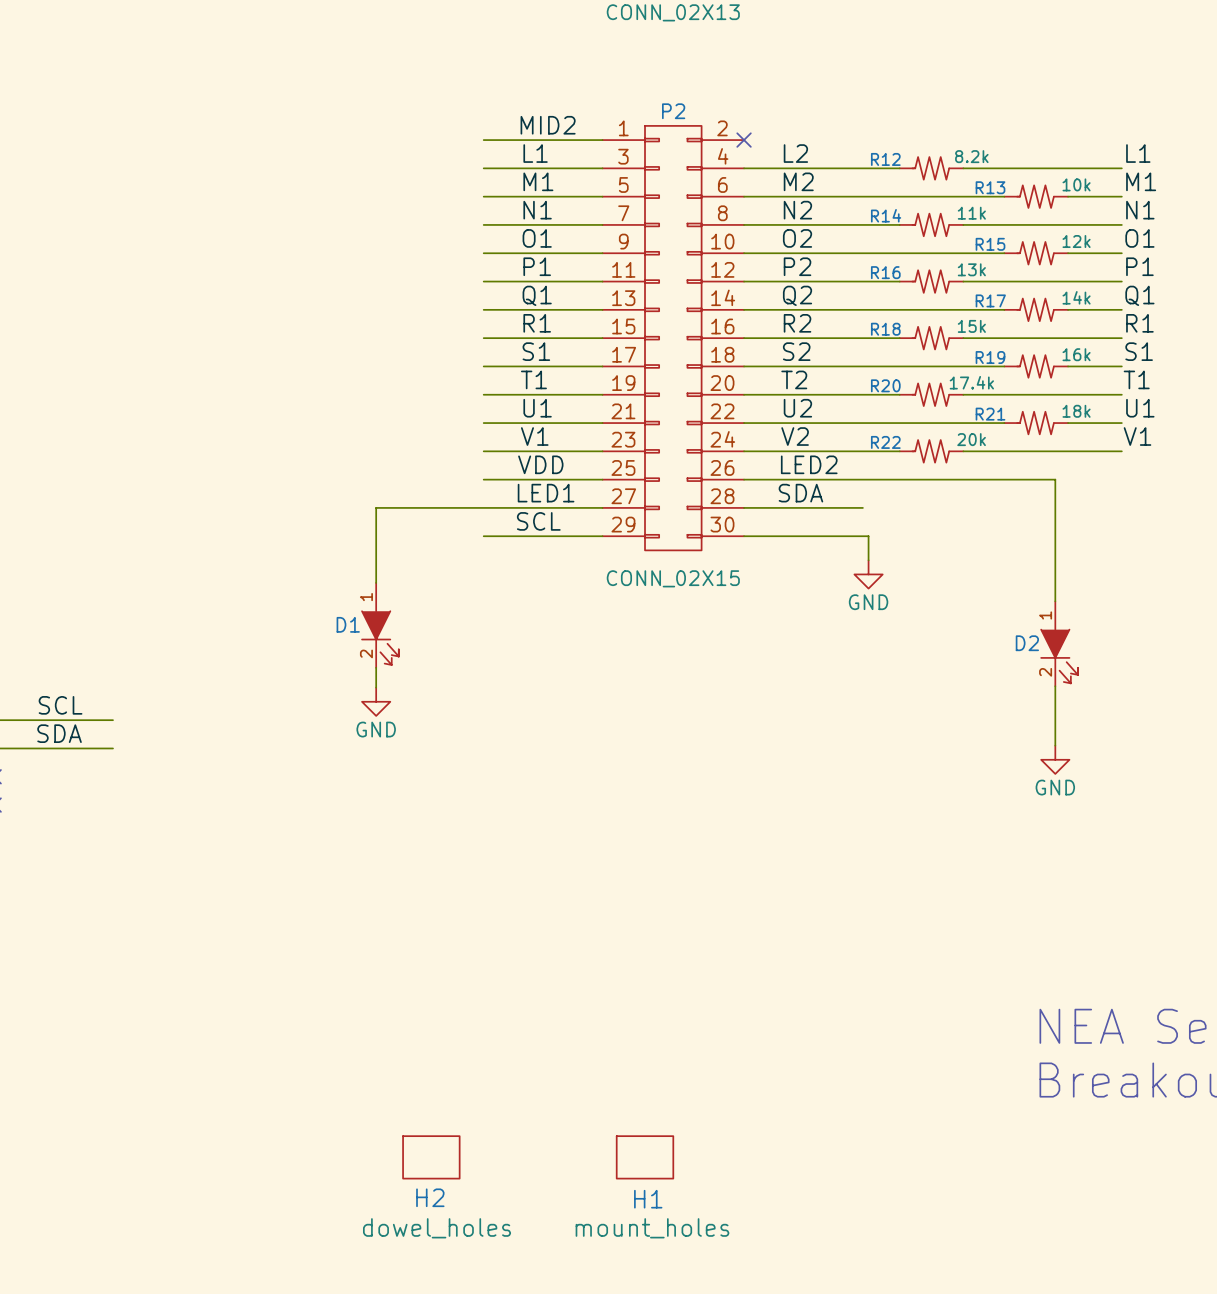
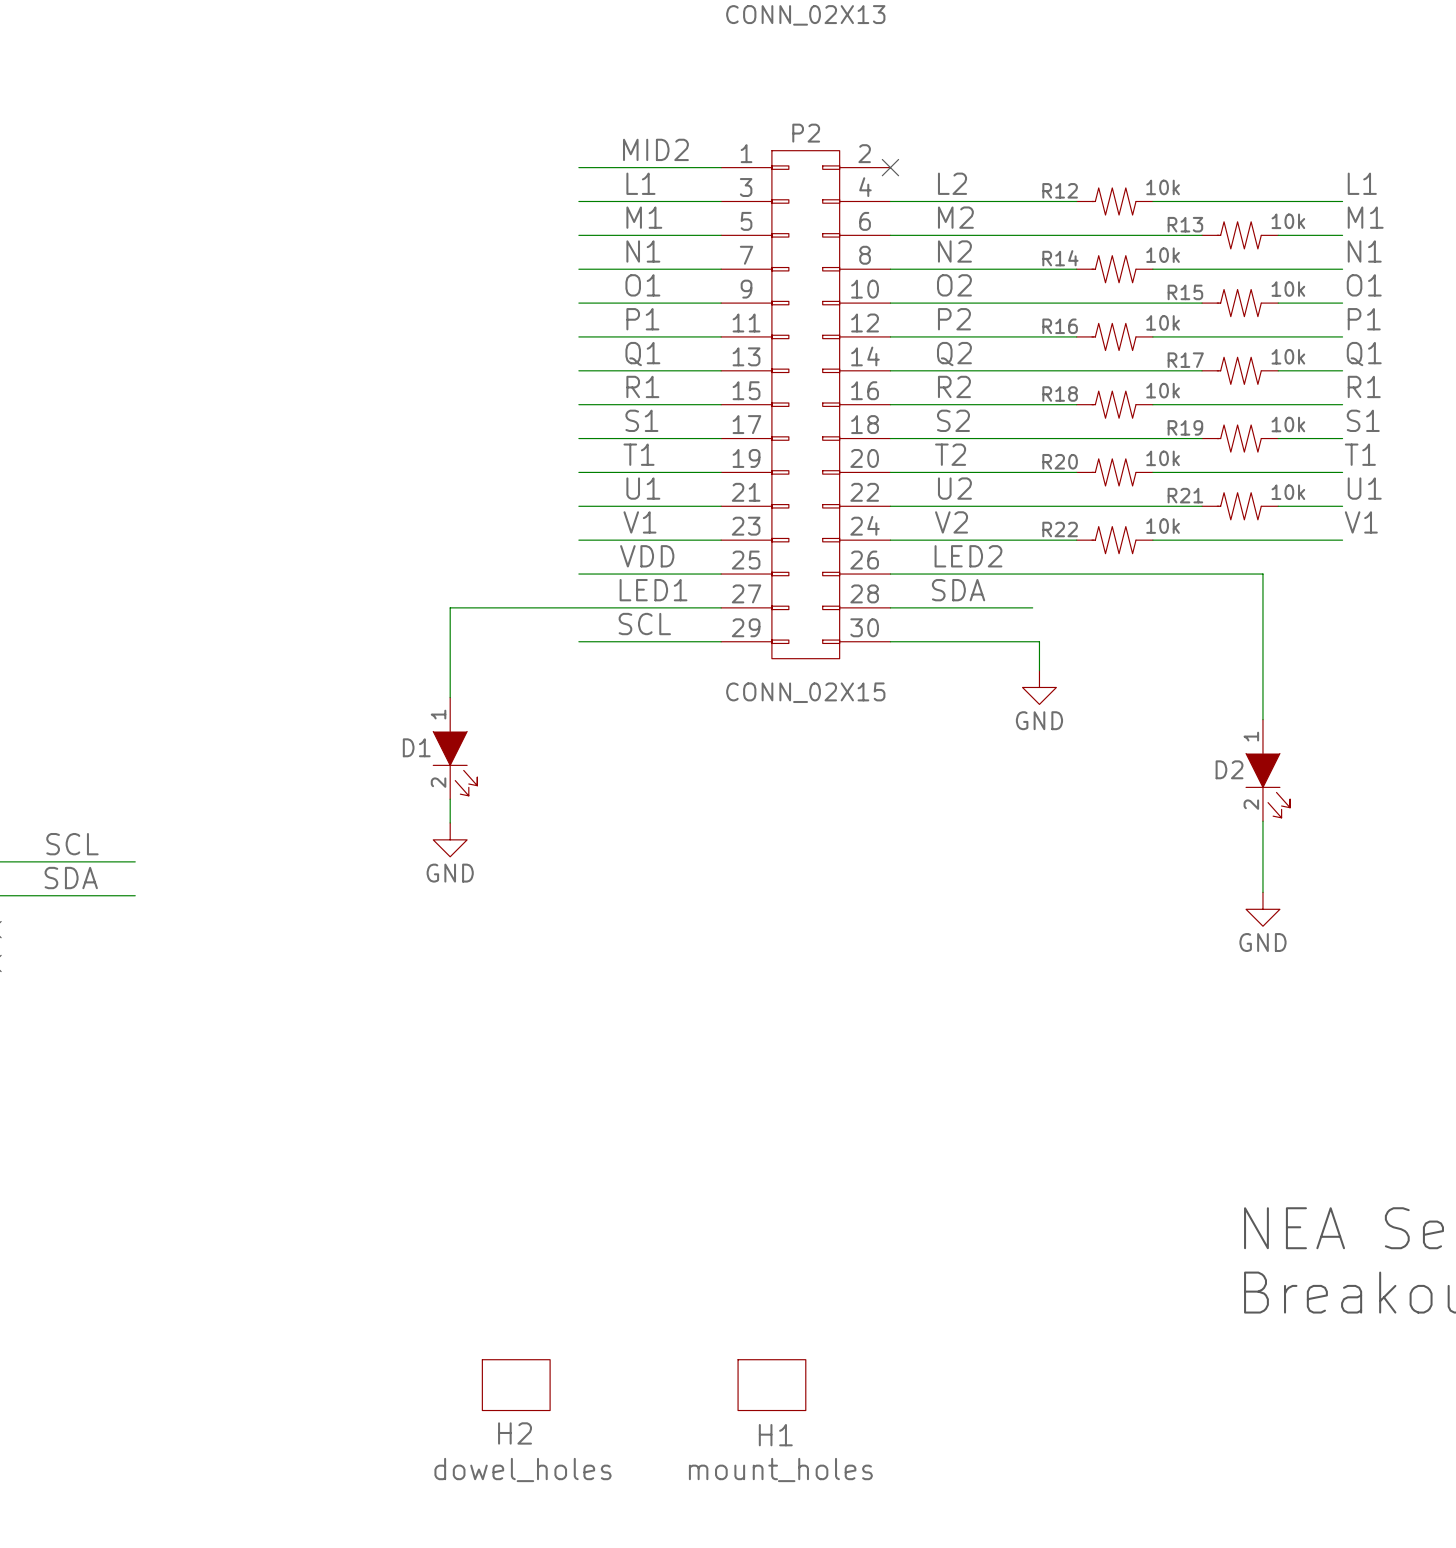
R12 value: 8.2k (971, 156) -> 10k (1163, 187)
R14 value: 11k (971, 213) -> 10k (1163, 255)
R15 value: 12k (1076, 241) -> 10k (1288, 289)
R16 value: 13k (971, 269) -> 10k (1163, 322)
R17 value: 14k (1076, 297) -> 10k (1288, 356)
R18 value: 15k (971, 326) -> 10k (1163, 390)
R19 value: 16k (1076, 354) -> 10k (1288, 424)
R20 value: 17.4k (971, 382) -> 10k (1163, 458)
R21 value: 18k (1076, 411) -> 10k (1288, 492)
R22 value: 20k (971, 439) -> 10k (1163, 526)

